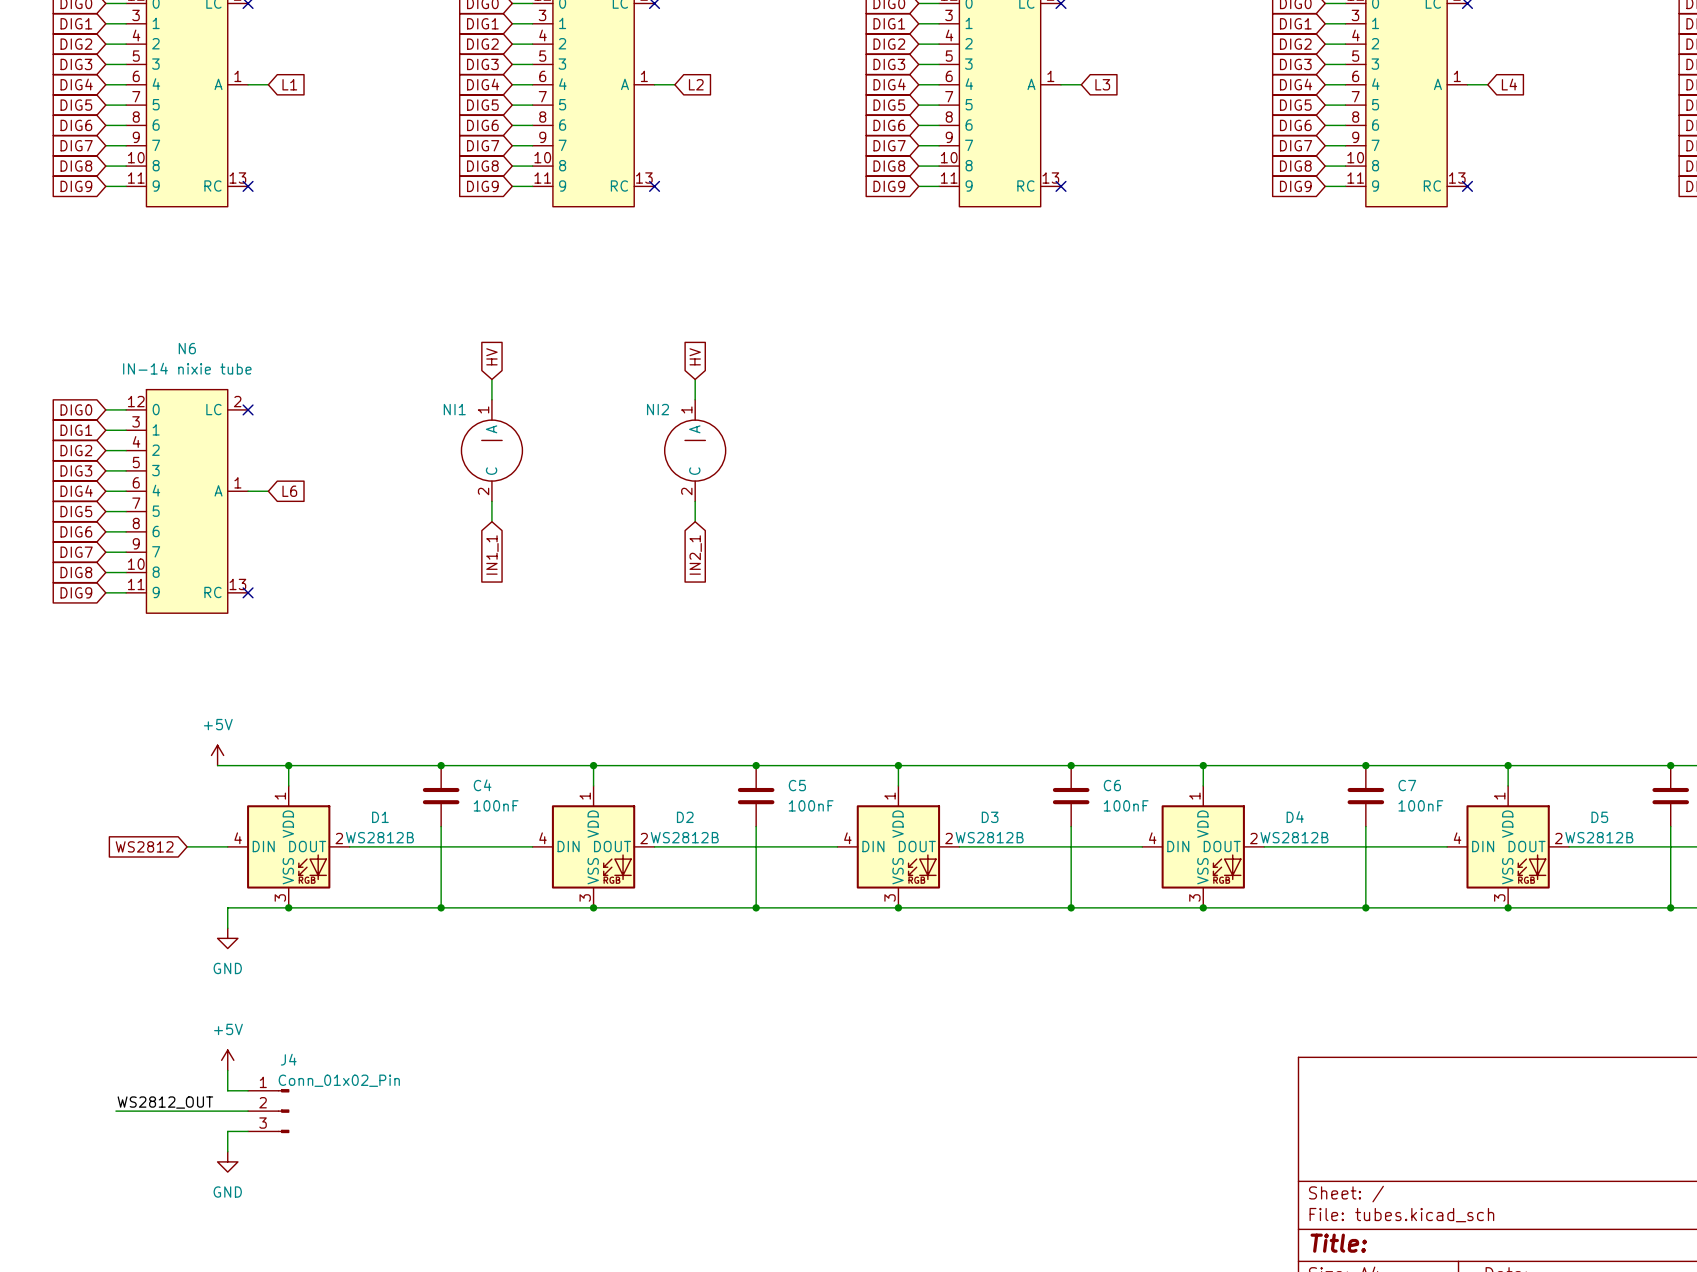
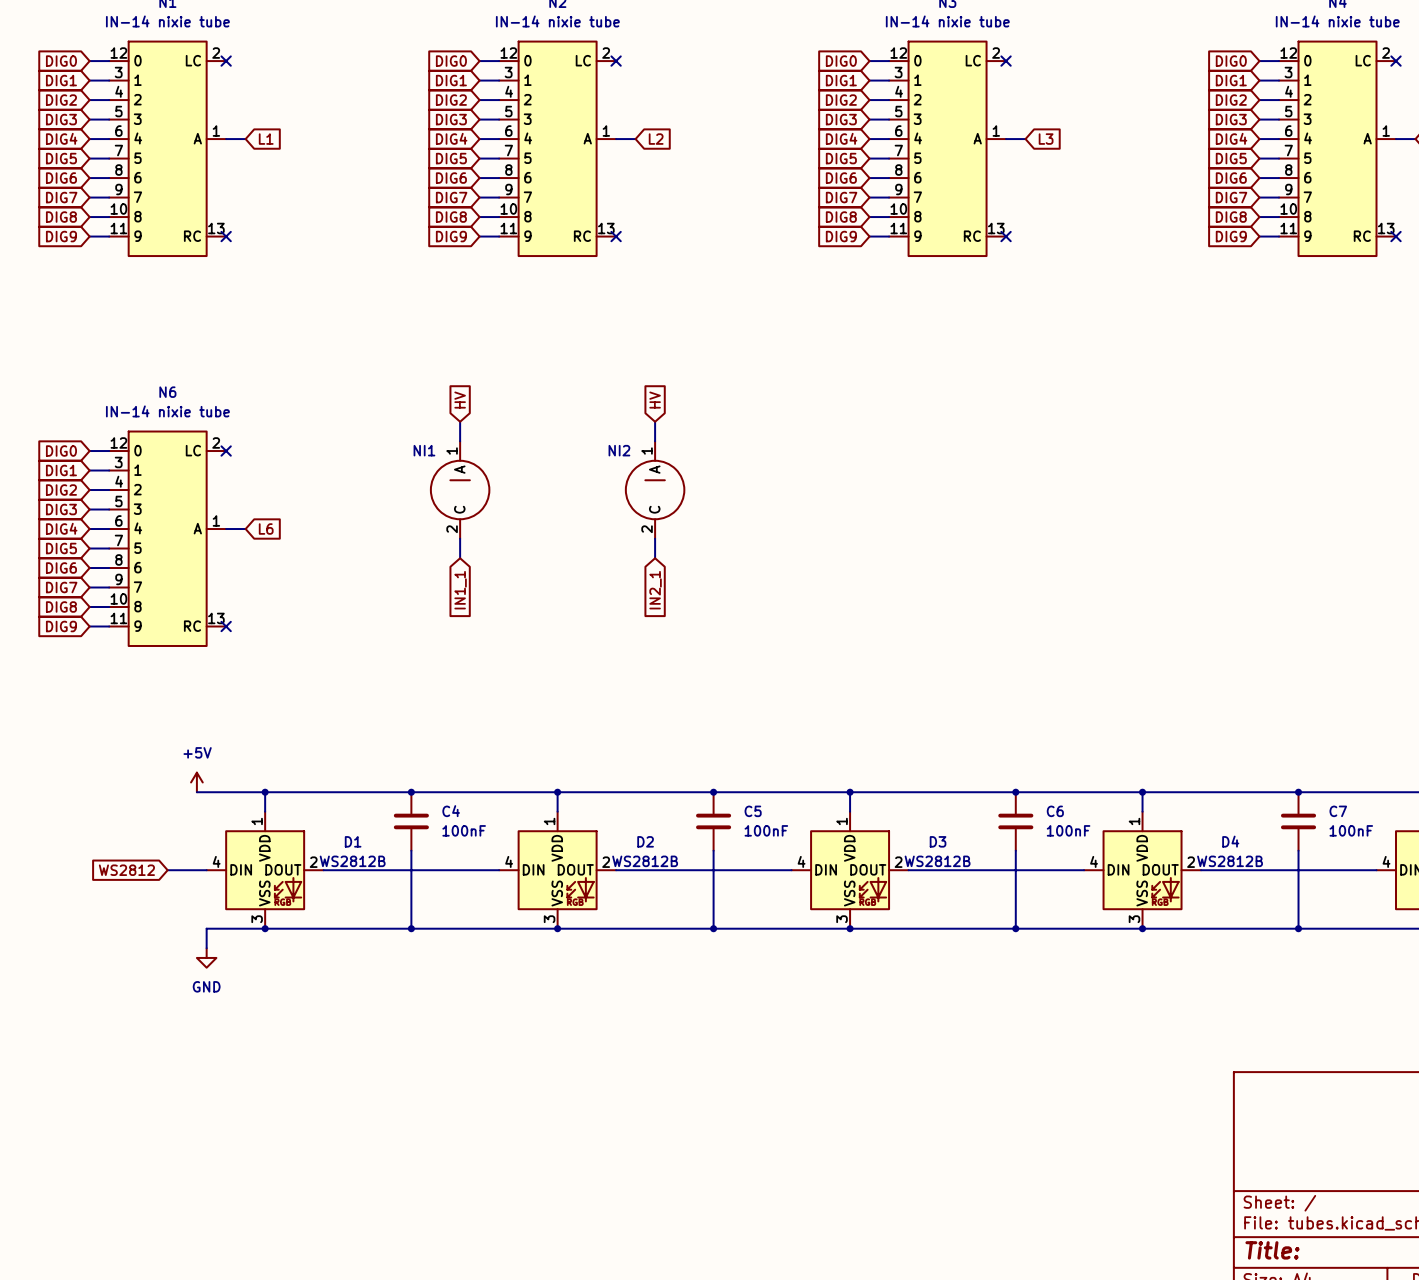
power symbol: +5V (227, 1060) -> none
wire: (227, 1070) (227, 1090) (248, 1090) -> none
label: WS2812_OUT (165, 1102) -> none
wire: (115, 1111) (248, 1111) -> none
J4: Conn_01x02_Pin (268, 1111) -> none
wire: (248, 1131) (227, 1131) (227, 1151) -> none
power symbol: GND (227, 1161) -> none

